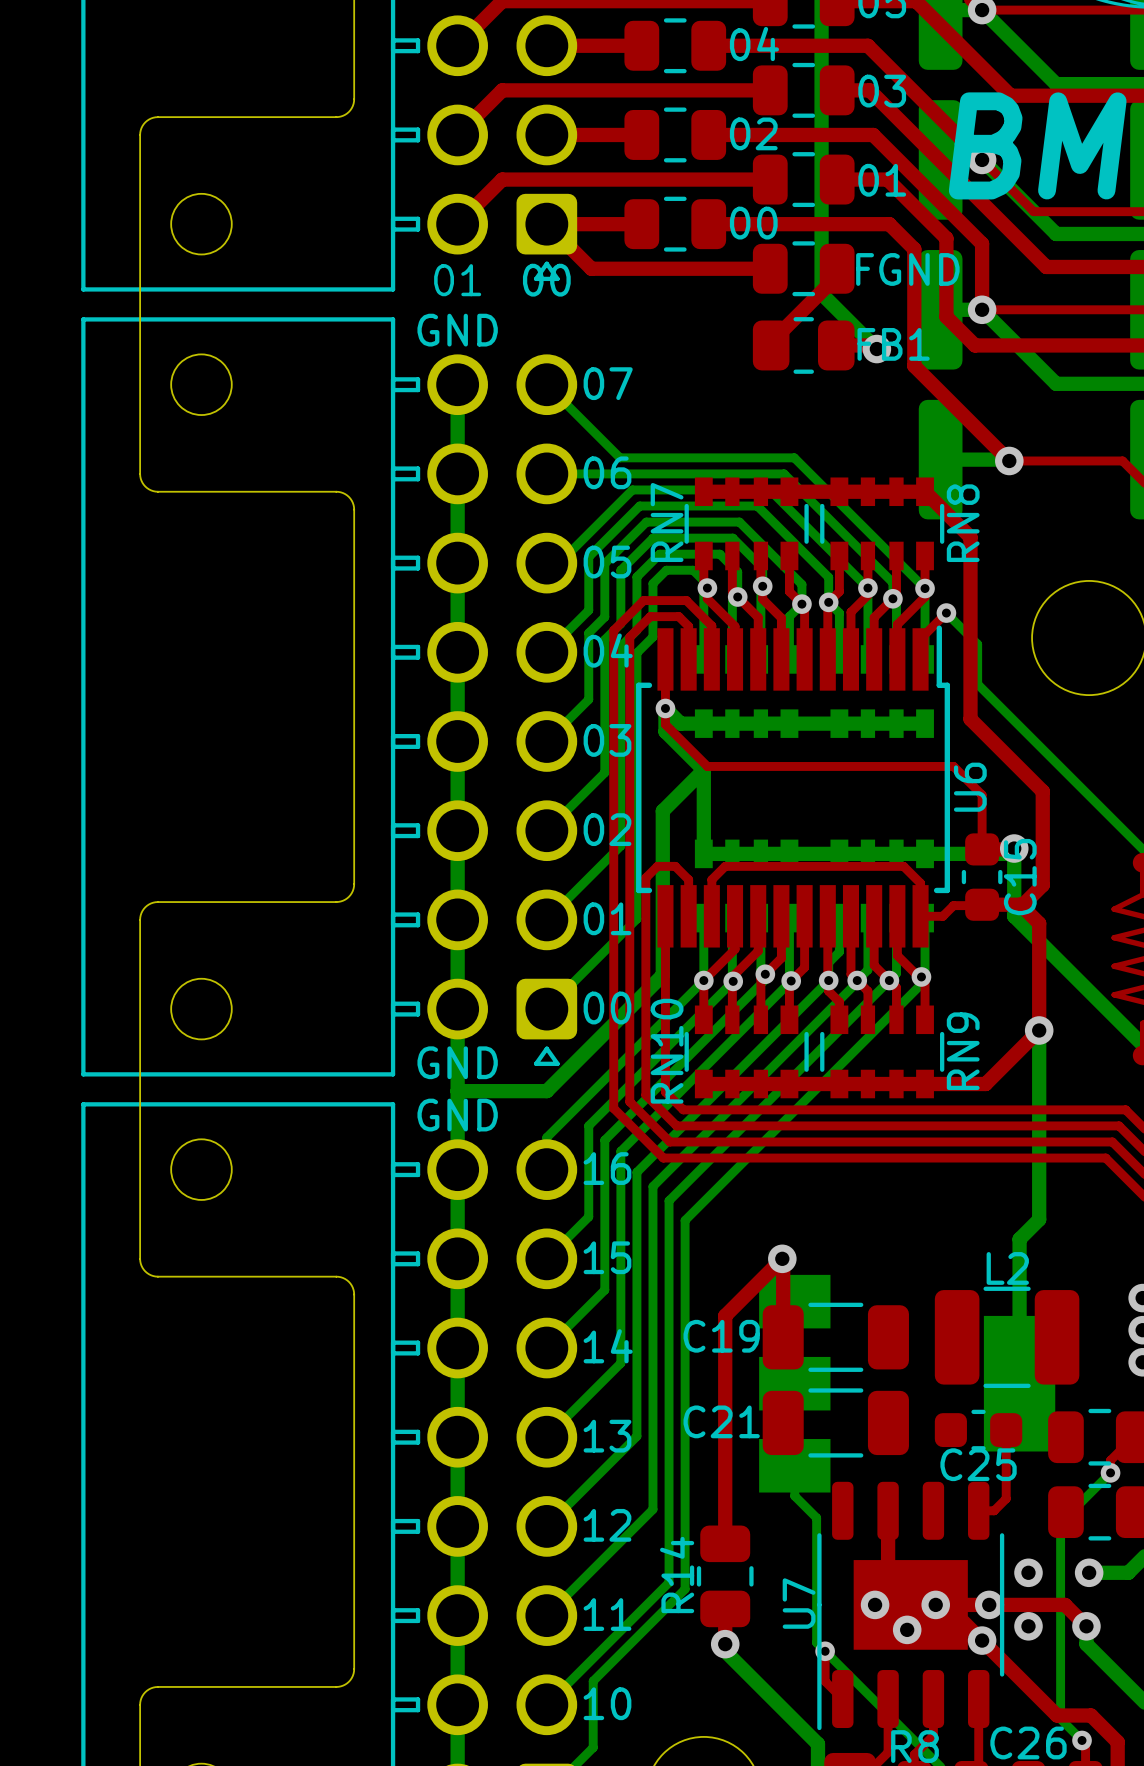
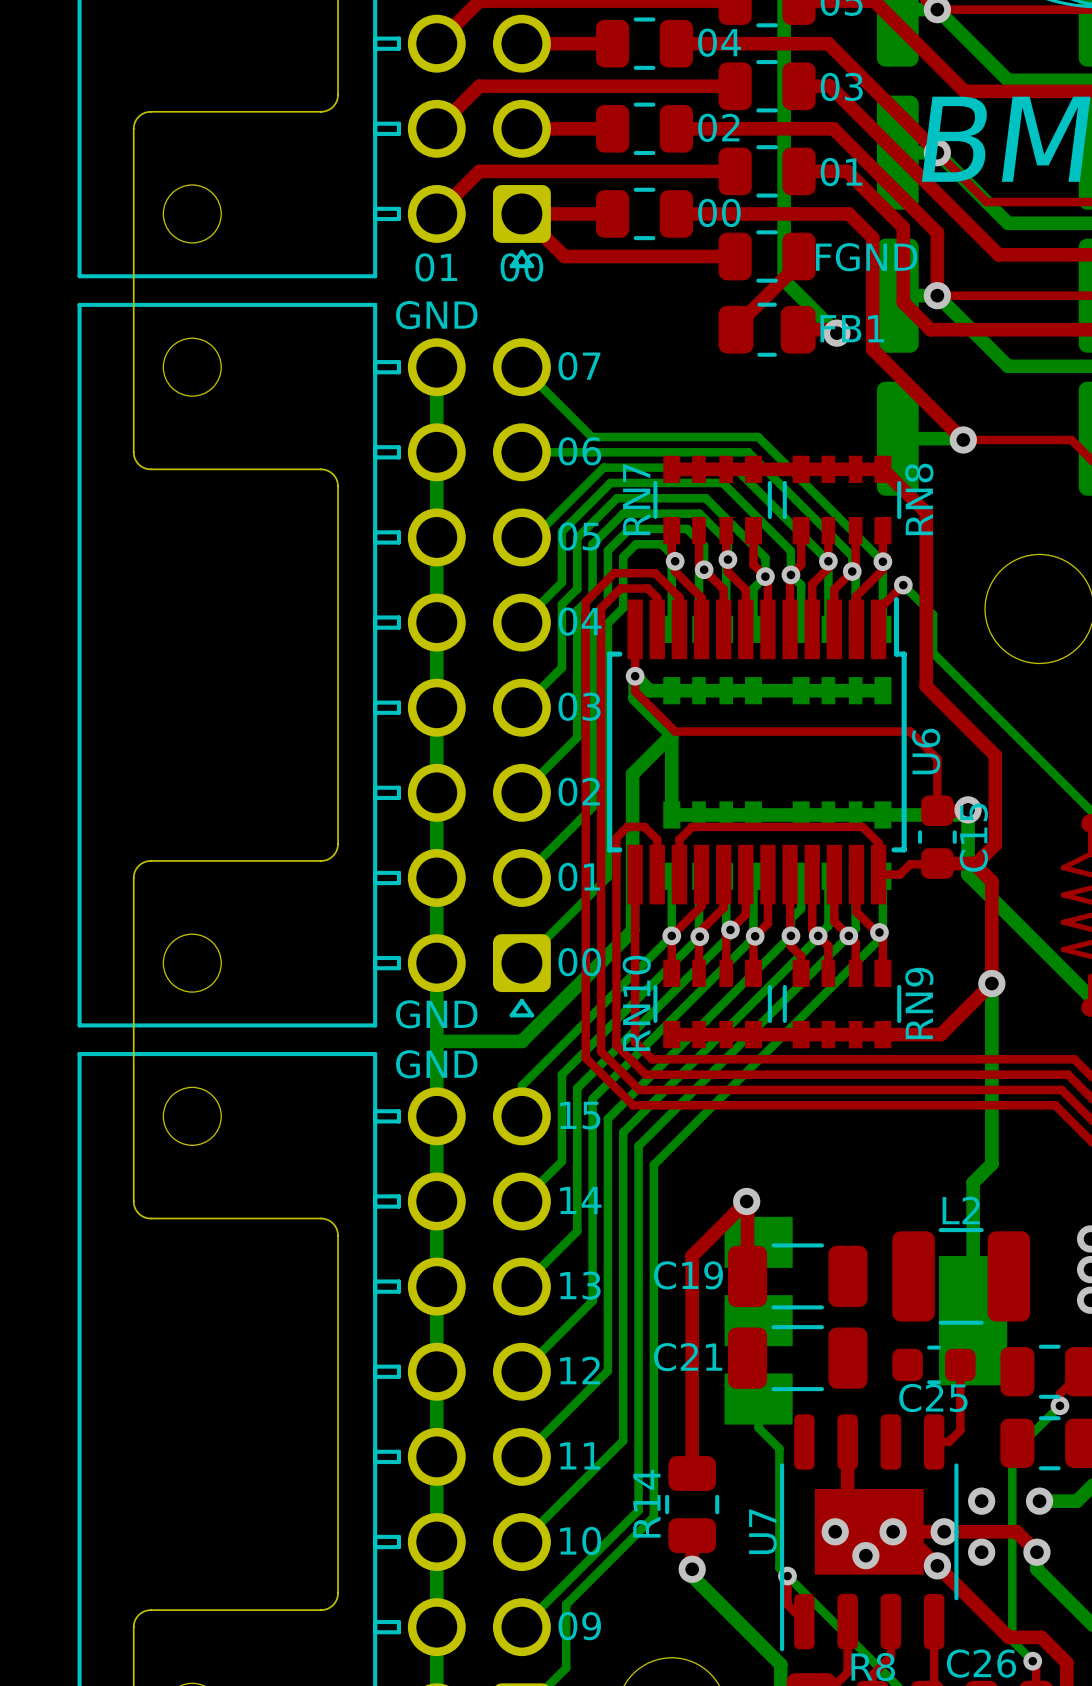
text: 16 (607, 1168) -> 15 (580, 1115)
text: 15 (607, 1257) -> 14 (580, 1200)
text: 14 (608, 1346) -> 13 (580, 1285)
text: 13 (607, 1436) -> 12 (580, 1370)
text: 12 (607, 1525) -> 11 (580, 1455)
text: 11 (607, 1614) -> 10 (580, 1541)
text: 10 (607, 1703) -> 09 (579, 1626)

